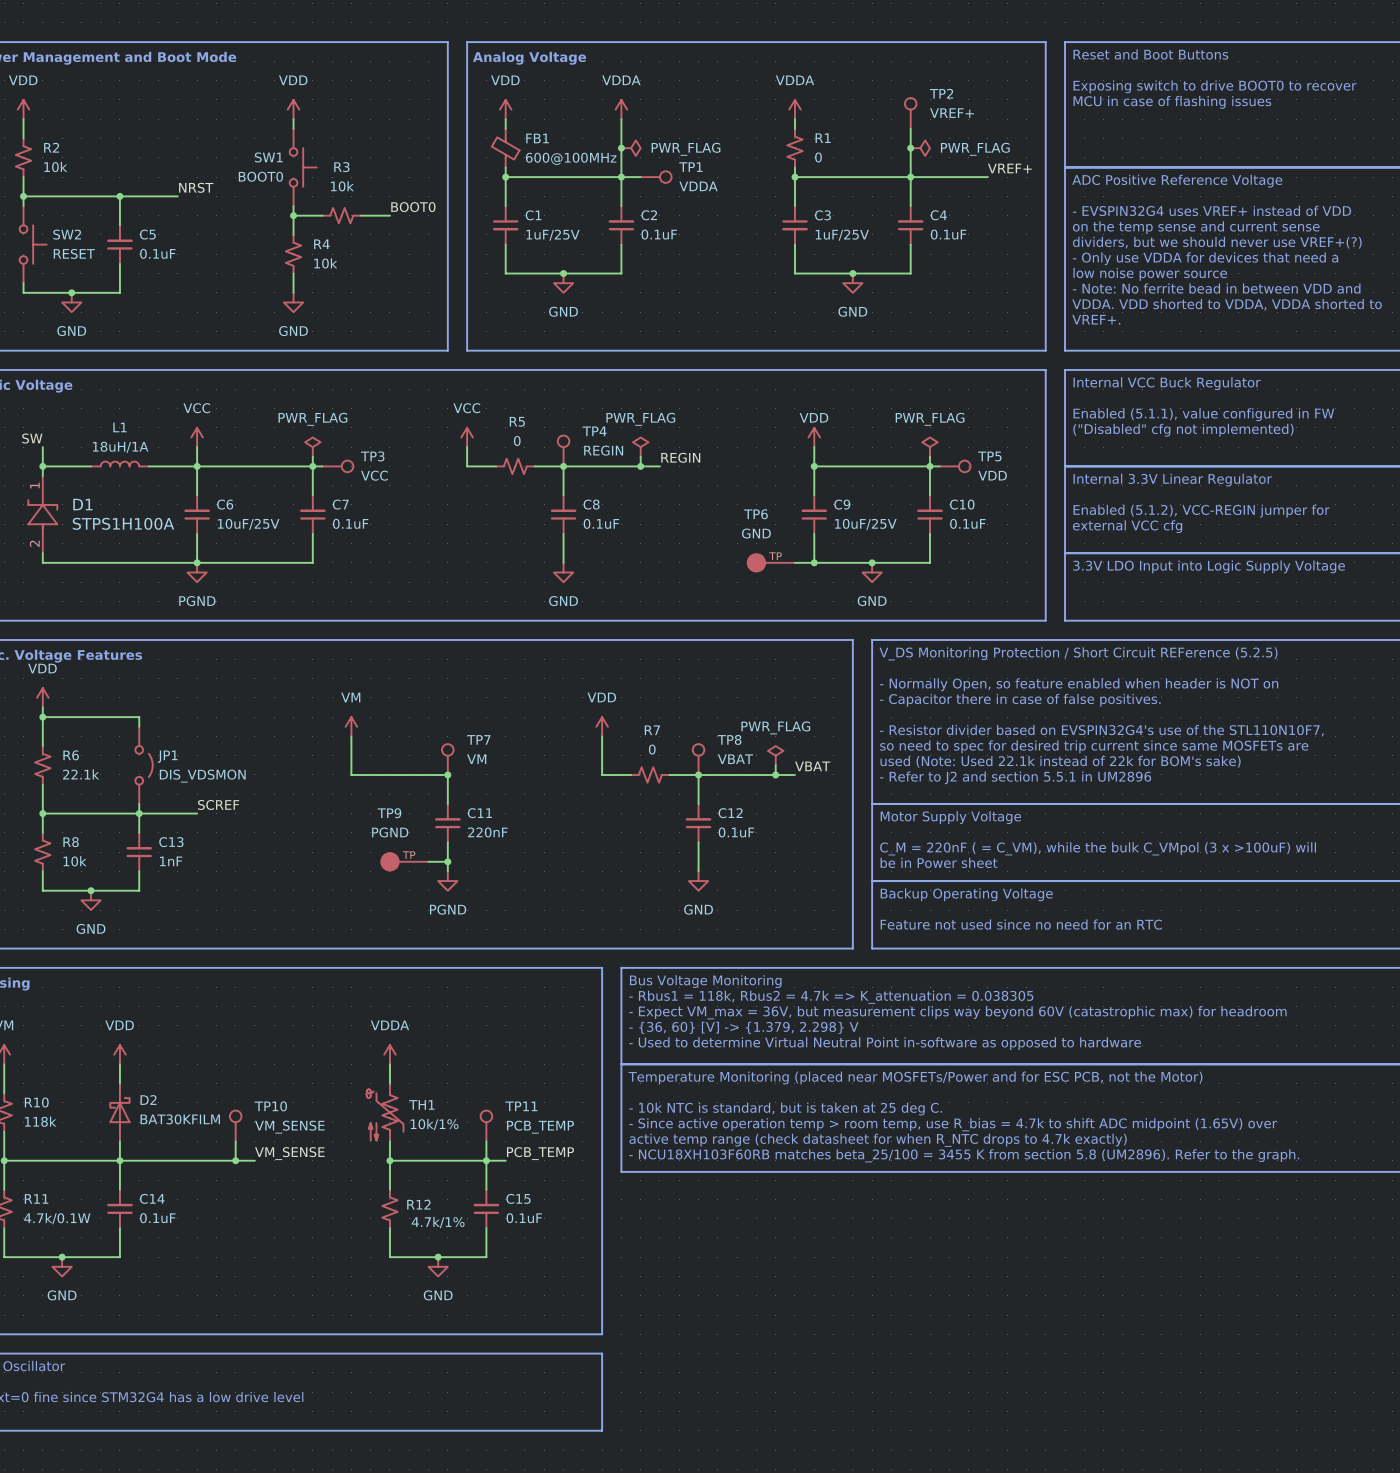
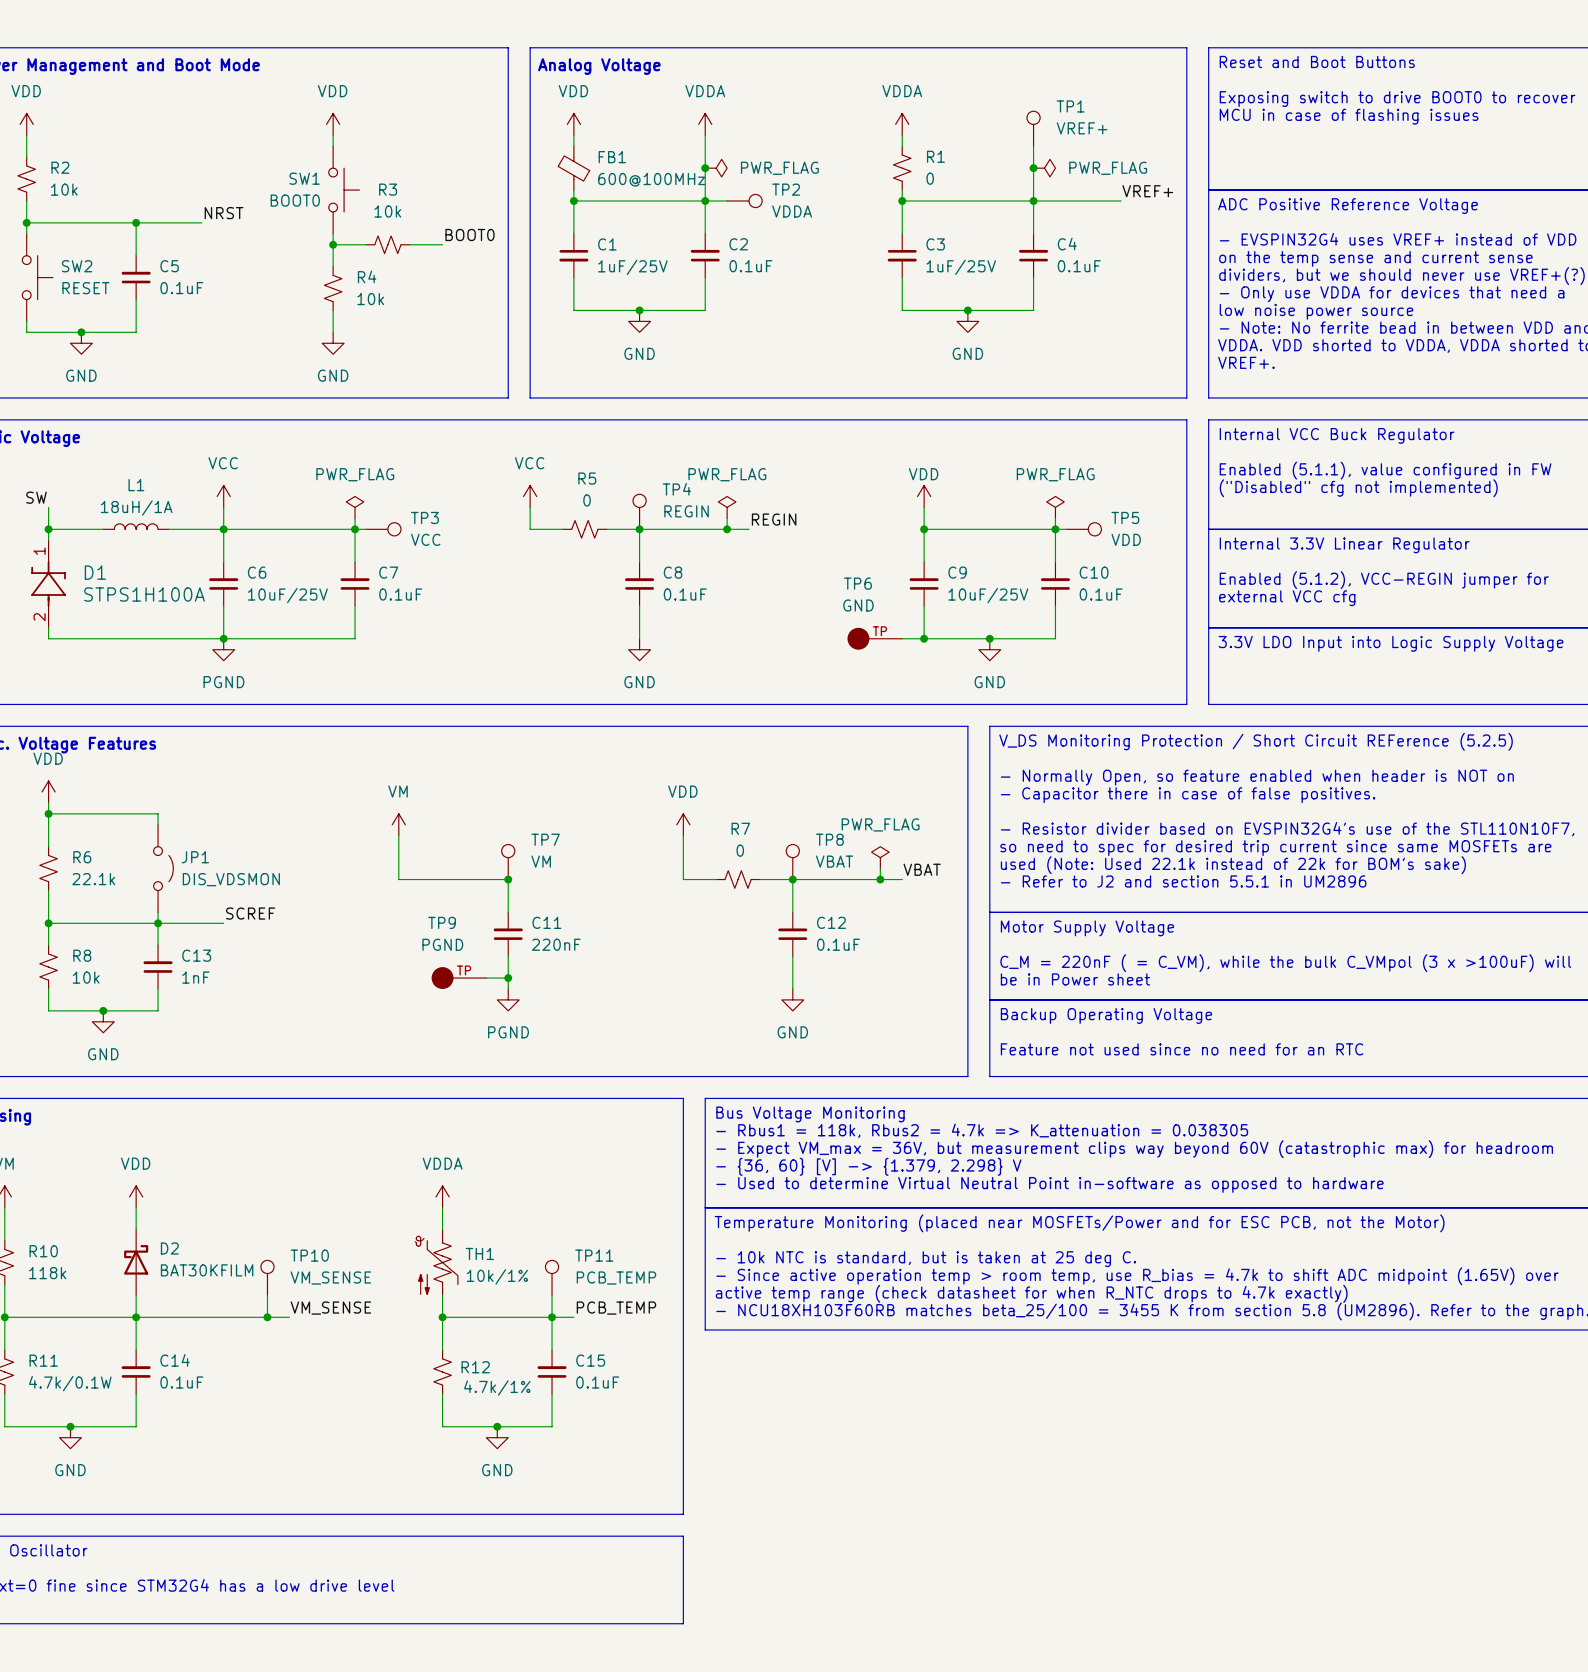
TP2 name: TP2 (941, 93) -> TP1 (1070, 106)
TP1 name: TP1 (690, 167) -> TP2 (786, 189)

